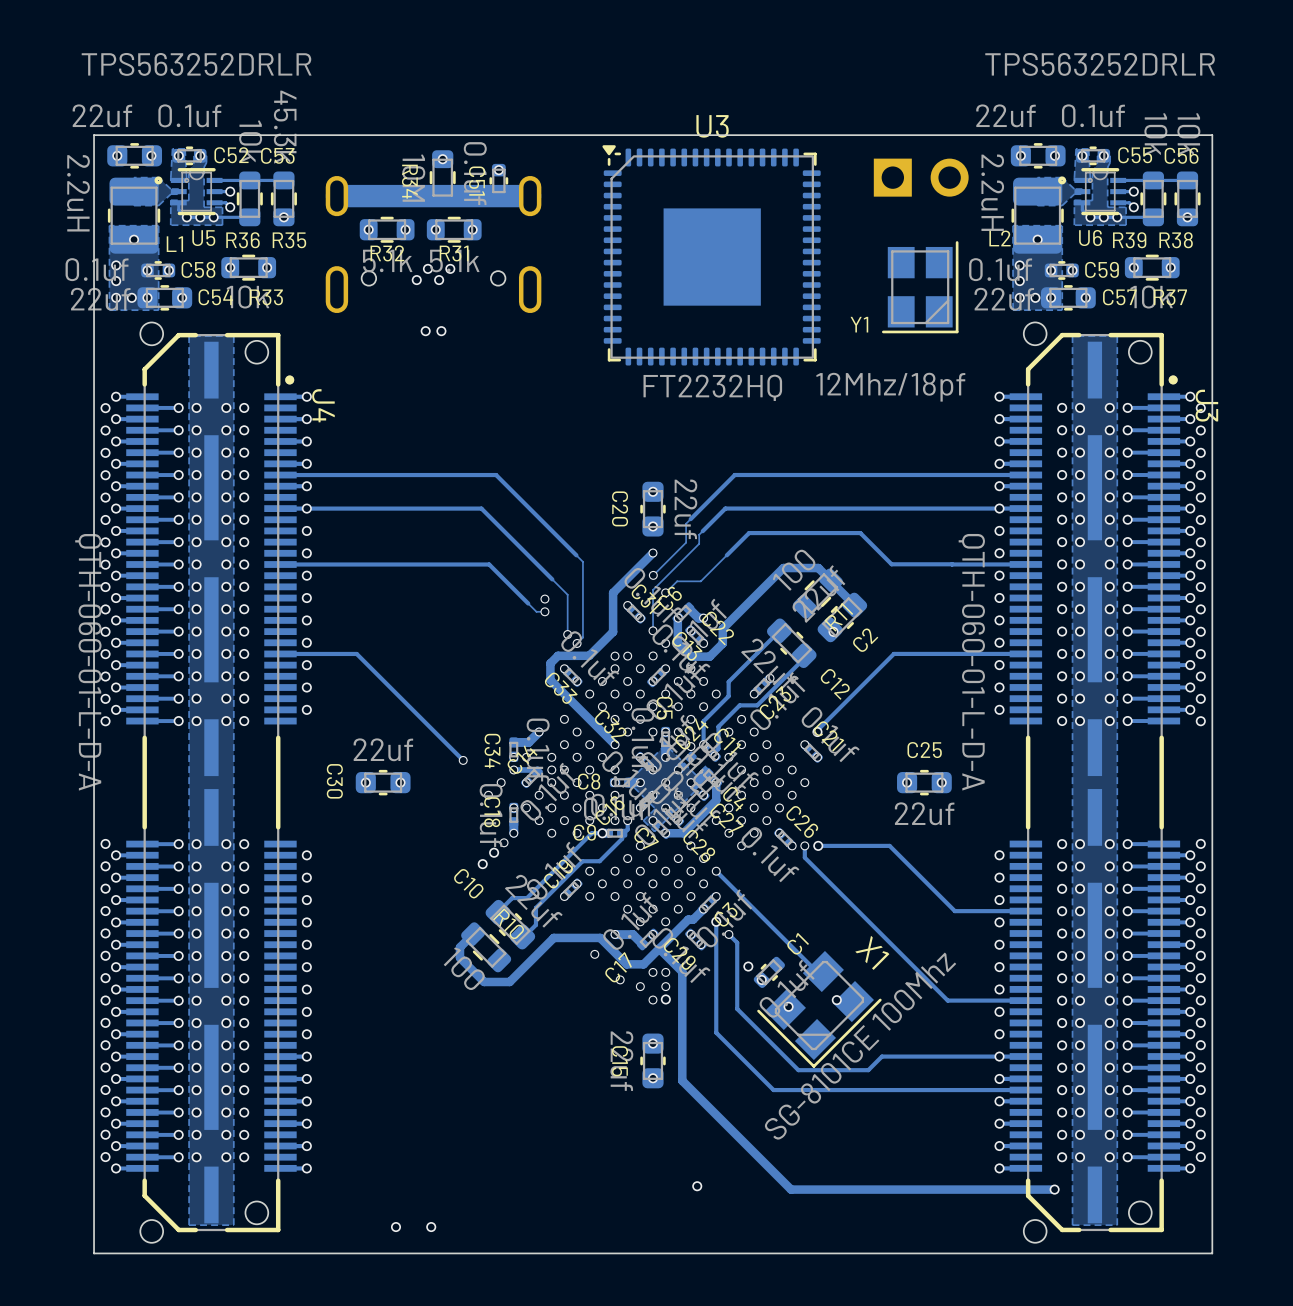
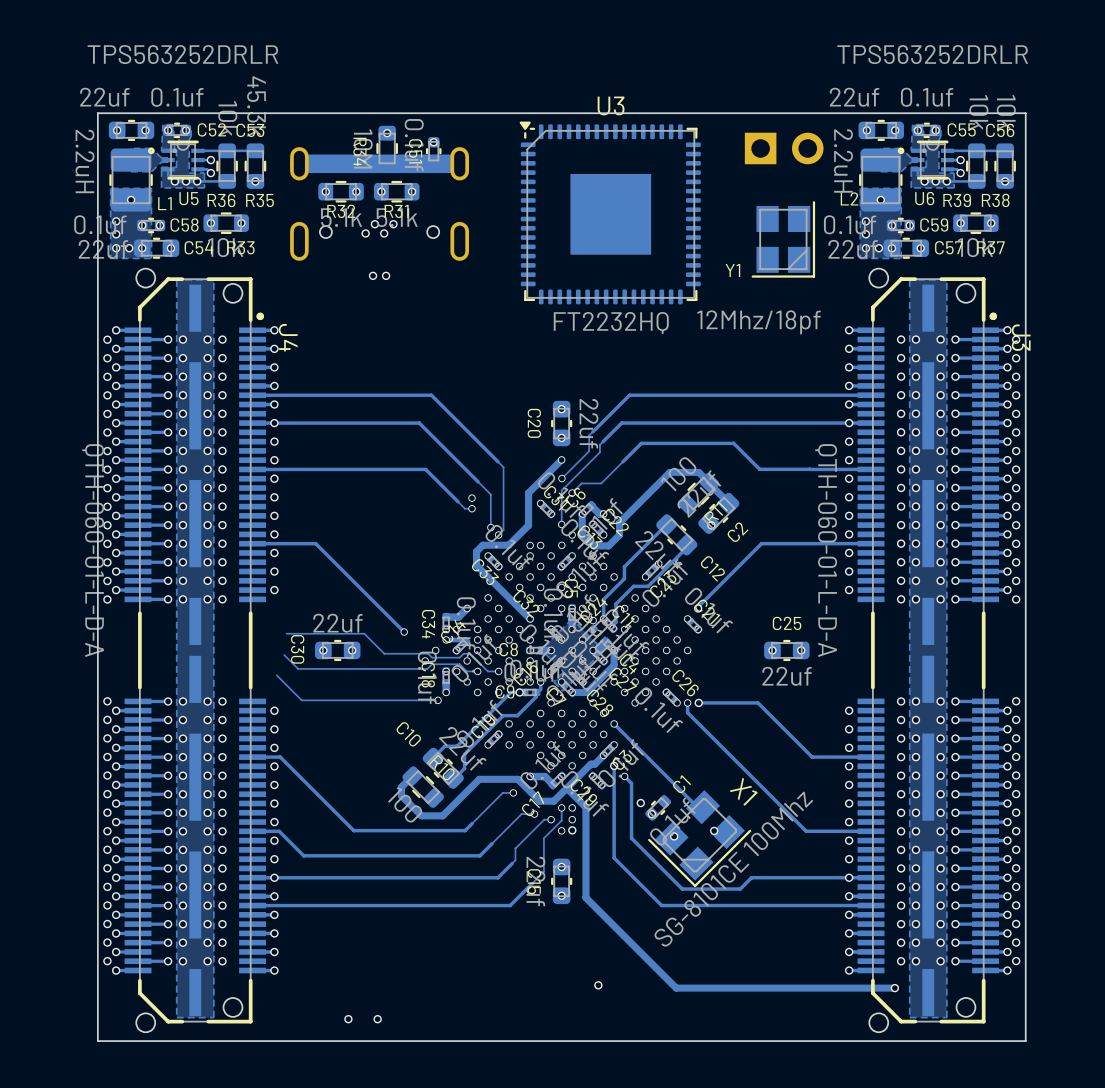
track: none -> (286, 633) (364, 633) (384, 653) (428, 653) (432, 657) (459, 657) (463, 653) (470, 653) (487, 671) (498, 671)
track: none -> (284, 654) (298, 668) (427, 668) (432, 664) (459, 664) (466, 671) (477, 671)
track: none -> (276, 675) (301, 700) (438, 700)
via: (494, 852) -> none
via: (482, 864) -> none
track: none -> (252, 757) (280, 757) (353, 830) (465, 830) (502, 792) (513, 792)
track: none -> (561, 807) (561, 820) (543, 838) (543, 871) (510, 905) (252, 905)
track: none -> (534, 814) (521, 814) (479, 855) (303, 855) (279, 831) (252, 831)
track: none -> (551, 819) (544, 819) (515, 848) (515, 860) (497, 877) (274, 877)

